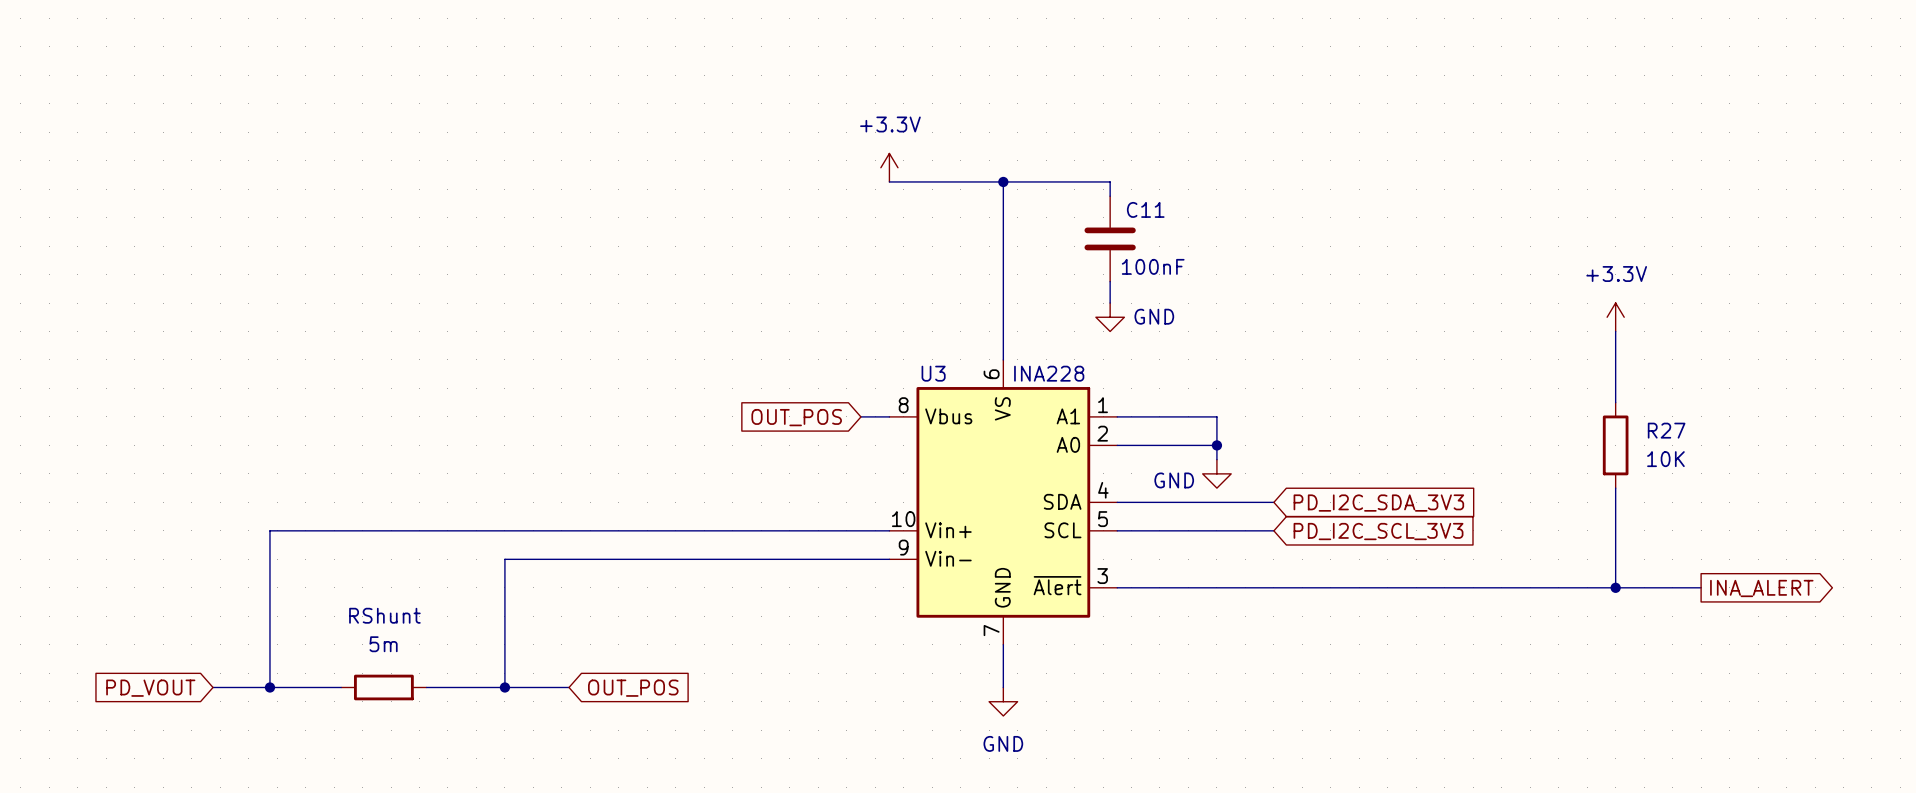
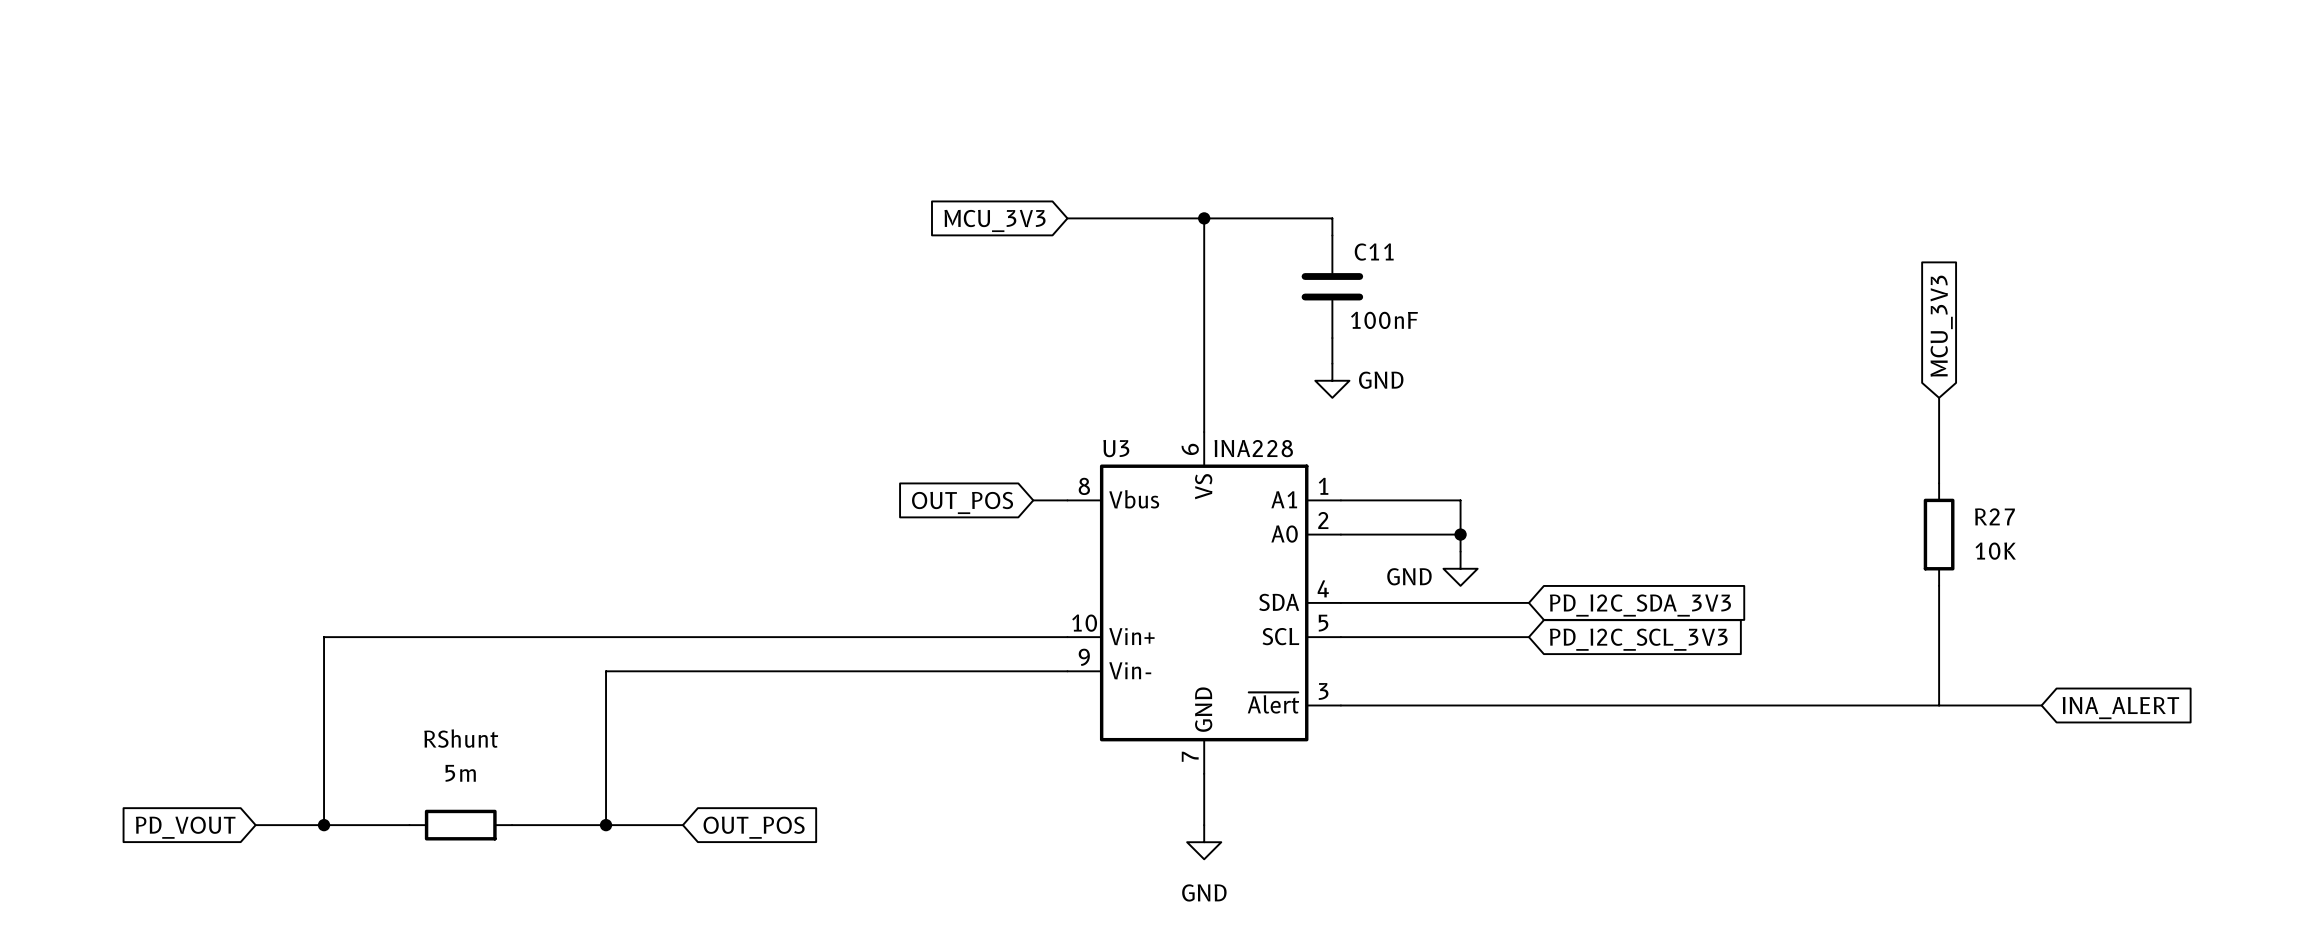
power symbol: +3.3V (889, 167) -> none
global label: none -> MCU_3V3 (995, 220)
global label: none -> MCU_3V3 (1941, 326)
power symbol: +3.3V (1615, 317) -> none
junction: (1615, 587) -> none
global label shape: output (1761, 588) -> input (2120, 708)

